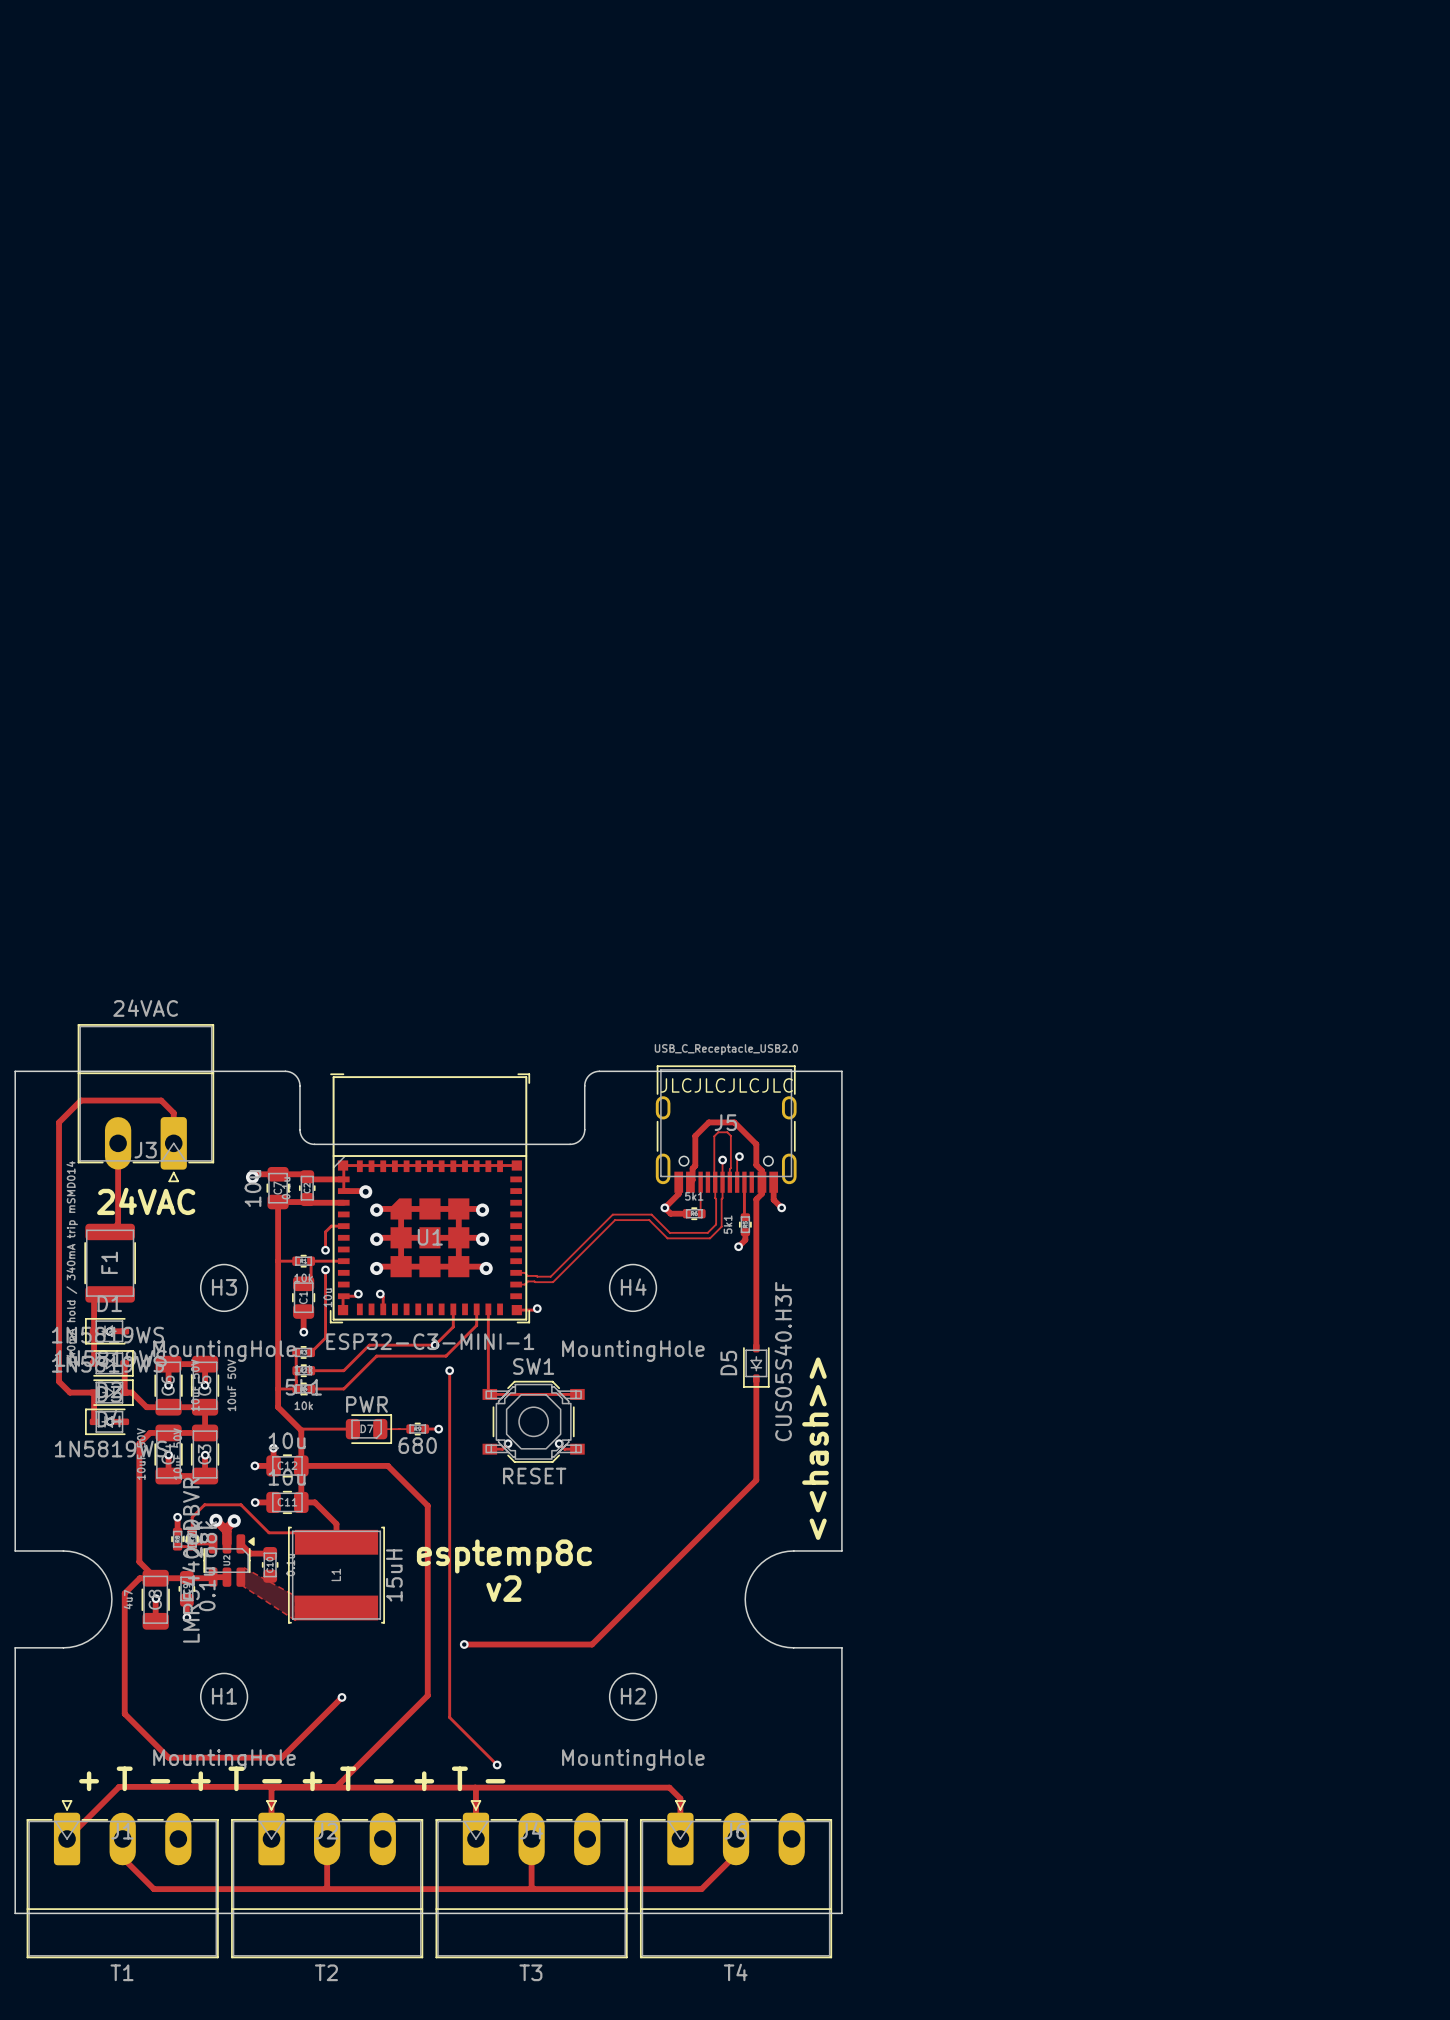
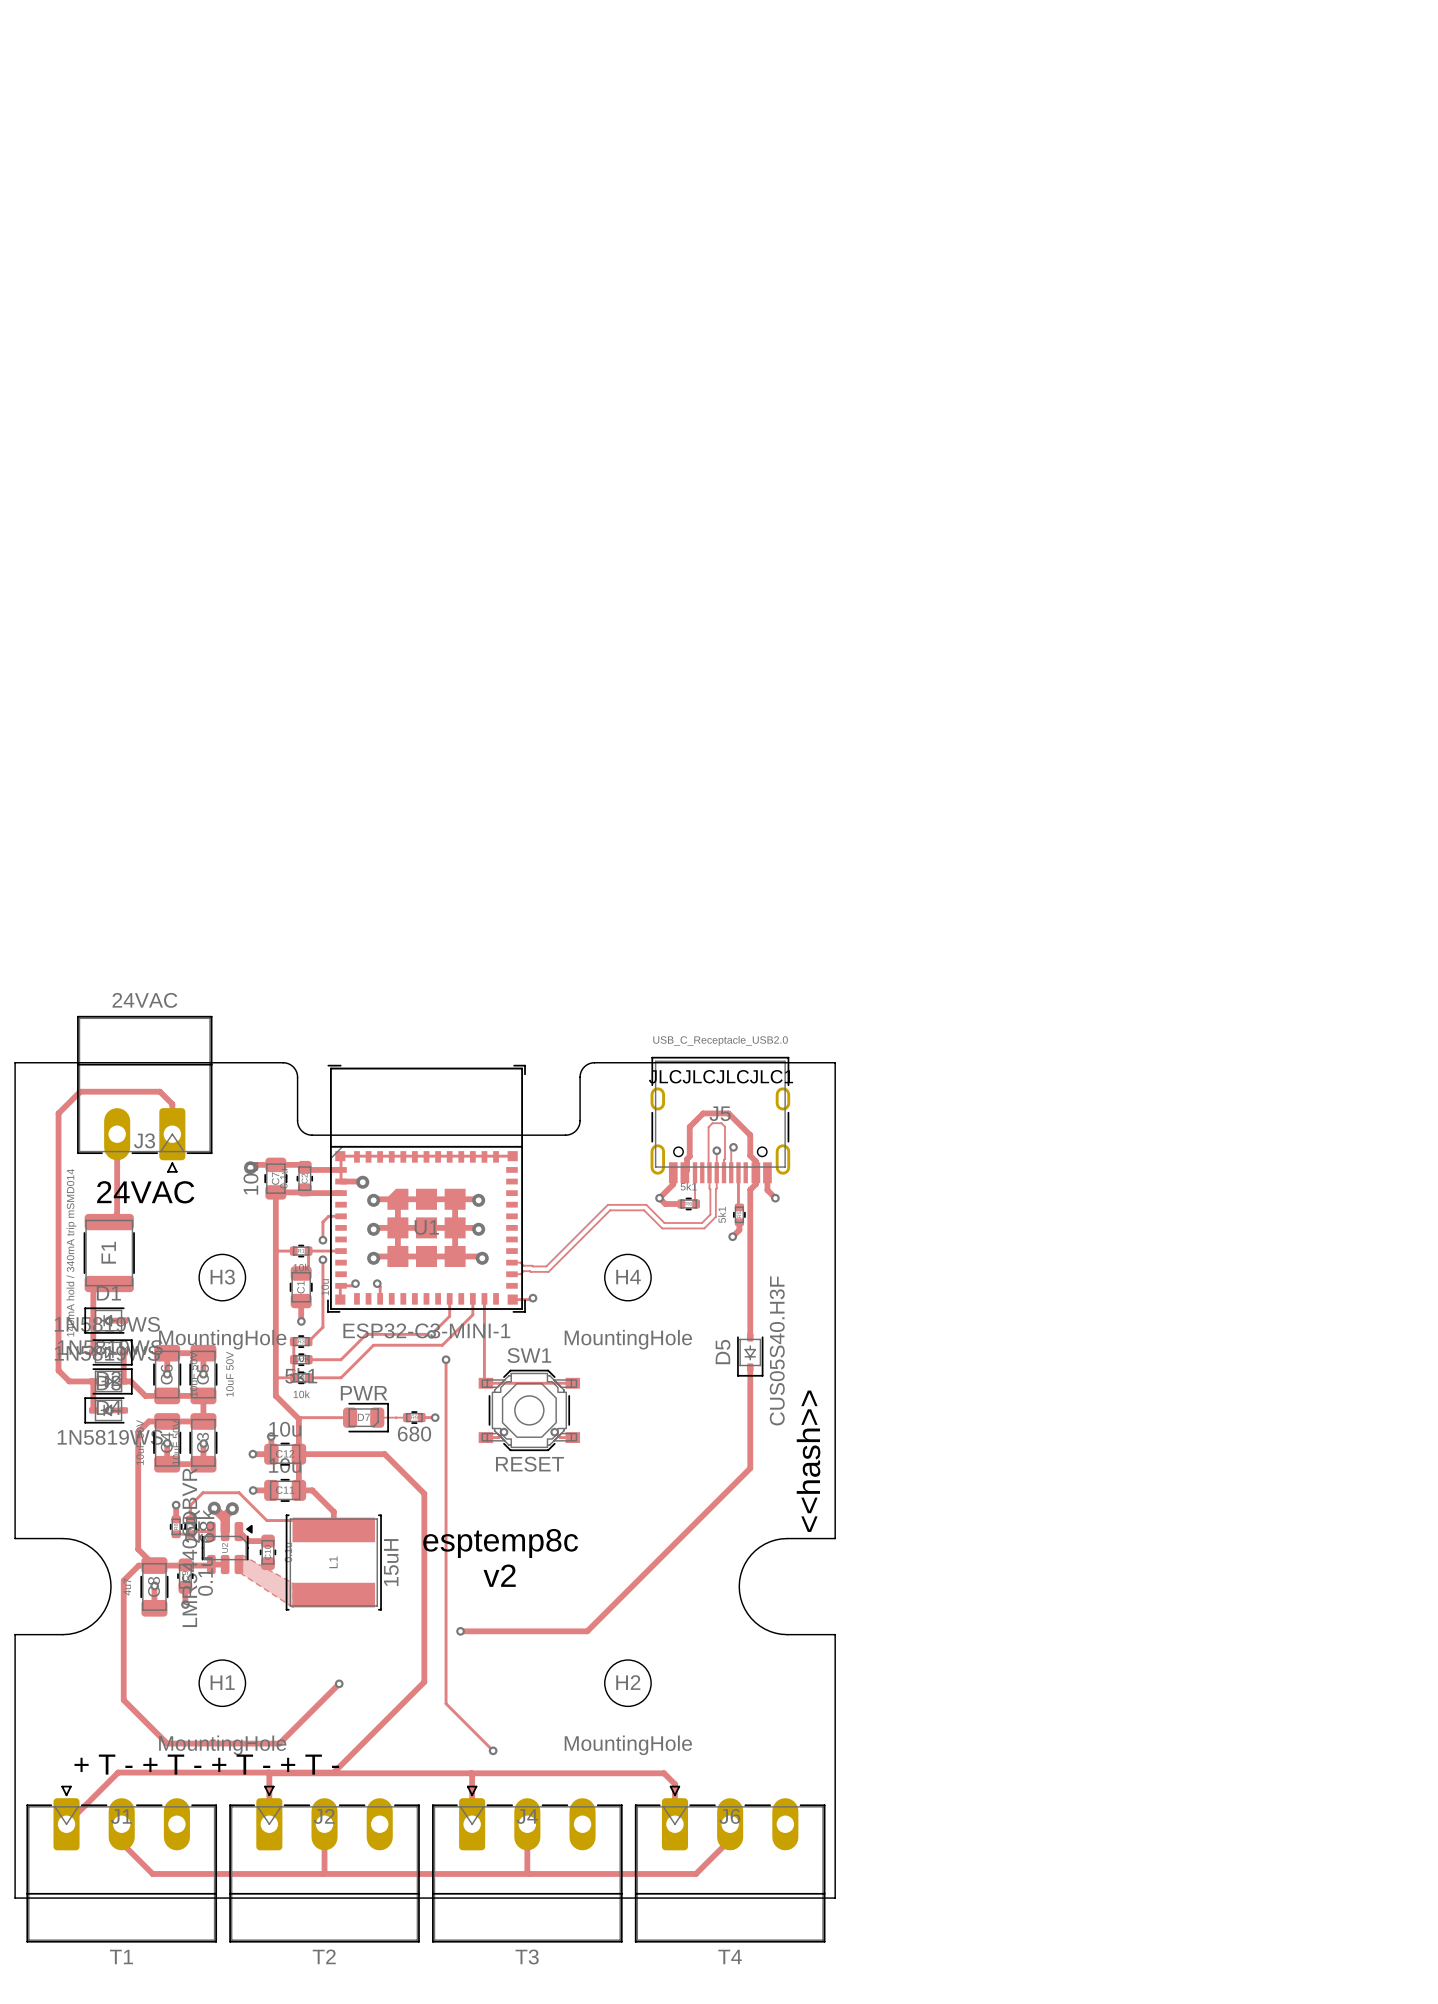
text: JLCJLCJLCJLC (726, 1085) -> JLCJLCJLCJLC1 (720, 1076)

